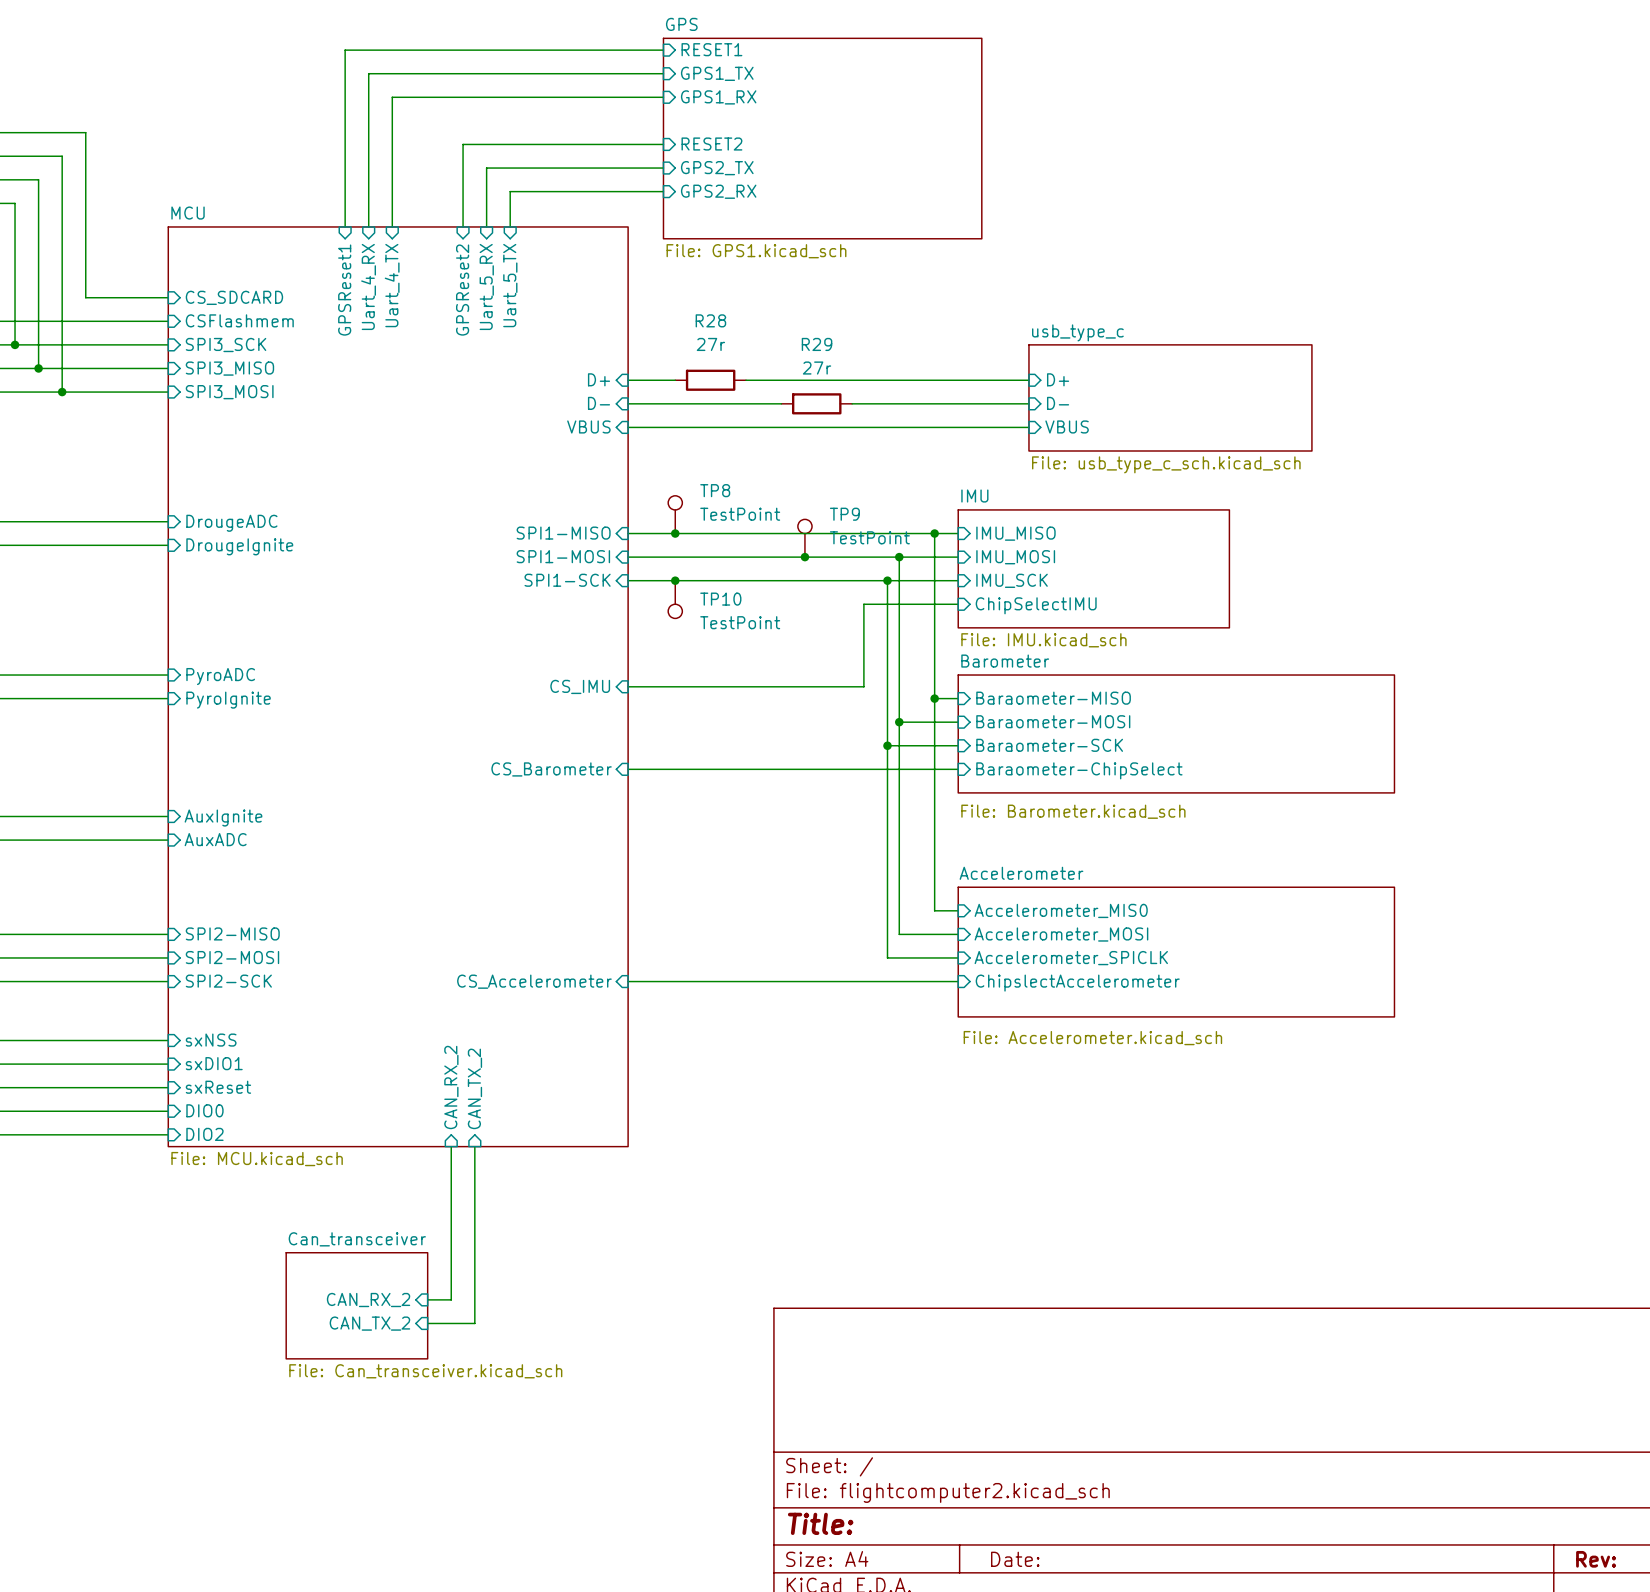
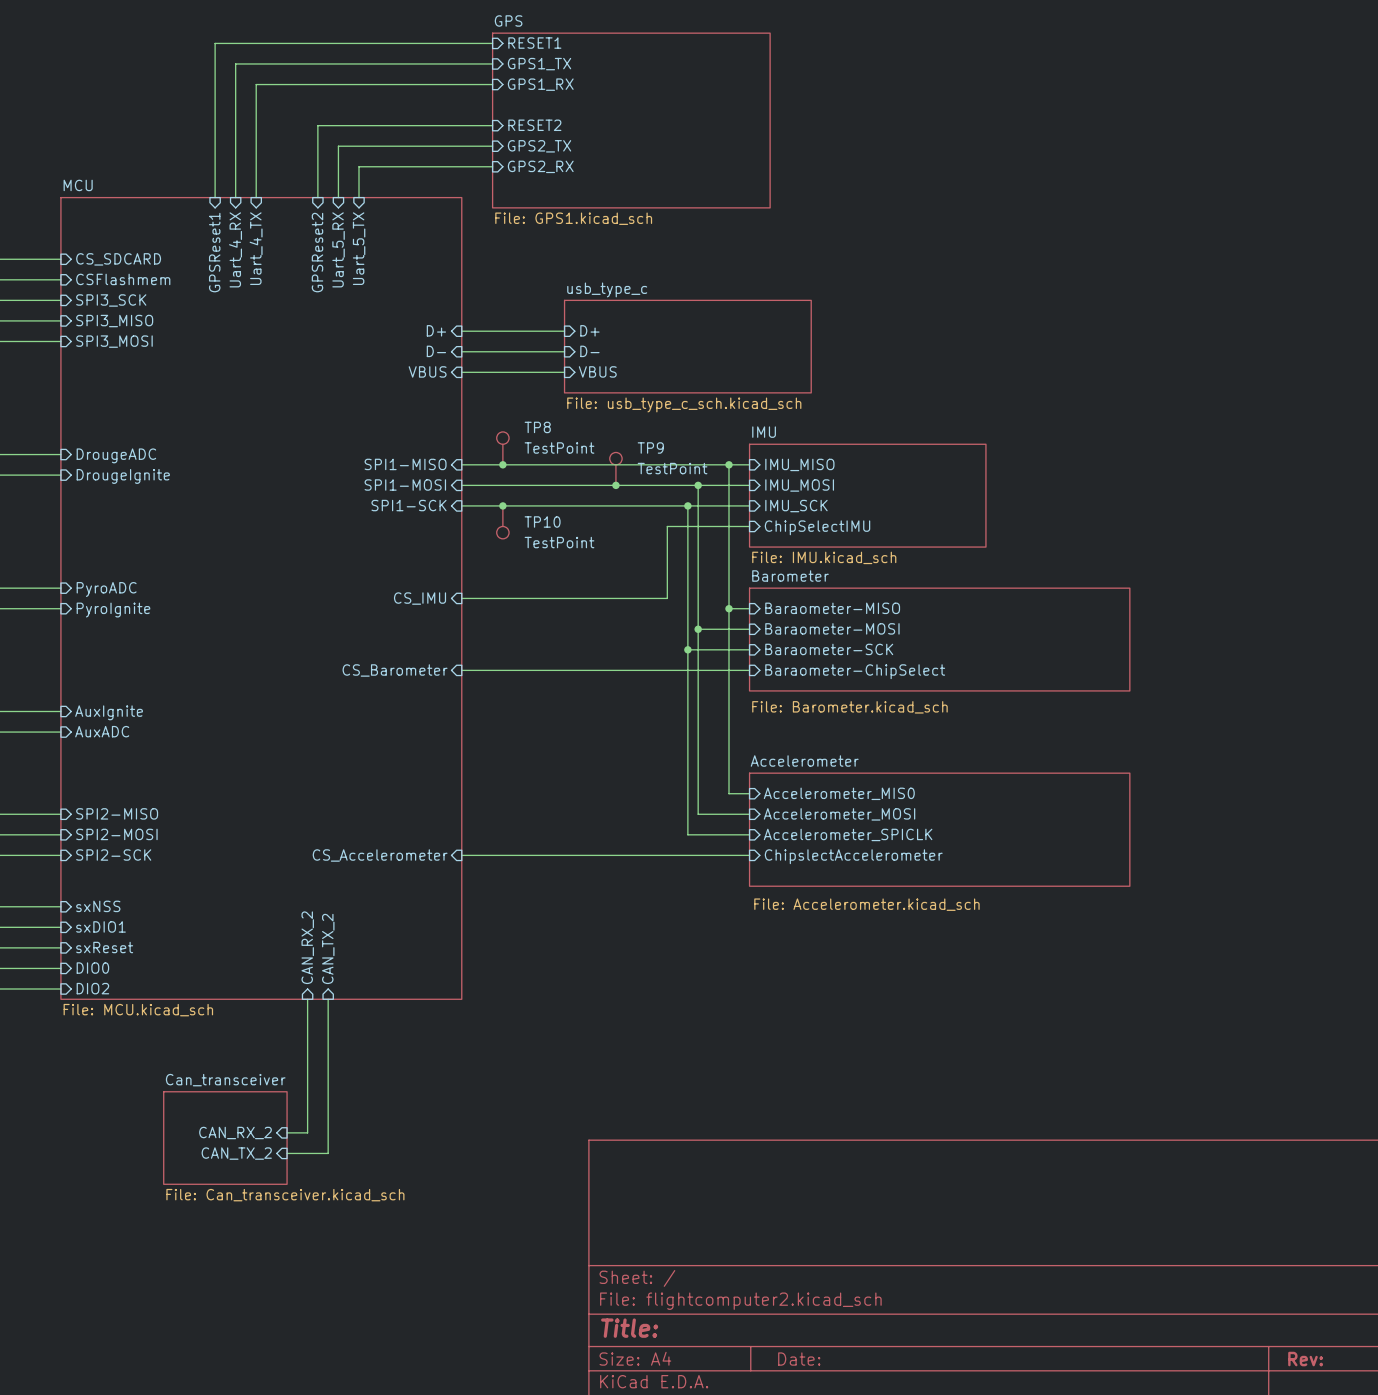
sheet pin: none -> D+ (589, 330)
sheet pin: D+ (1058, 379) -> none
R28: 27r (710, 380) -> none
wire: (746, 380) (1028, 380) -> (564, 331) (502, 331)
sheet usb_type_c: none -> File: usb_type_c_sch.kicad_sch (687, 346)
sheet usb_type_c: File: usb_type_c_sch.kicad_sch (1170, 397) -> none
wire: (746, 403) (781, 403) -> none
sheet pin: none -> D- (589, 351)
R29: 27r (816, 403) -> none
wire: (852, 403) (1028, 403) -> none
sheet pin: D- (1058, 403) -> none
sheet pin: none -> VBUS (597, 371)
sheet pin: VBUS (1067, 426) -> none
wire: (746, 427) (1028, 427) -> none

